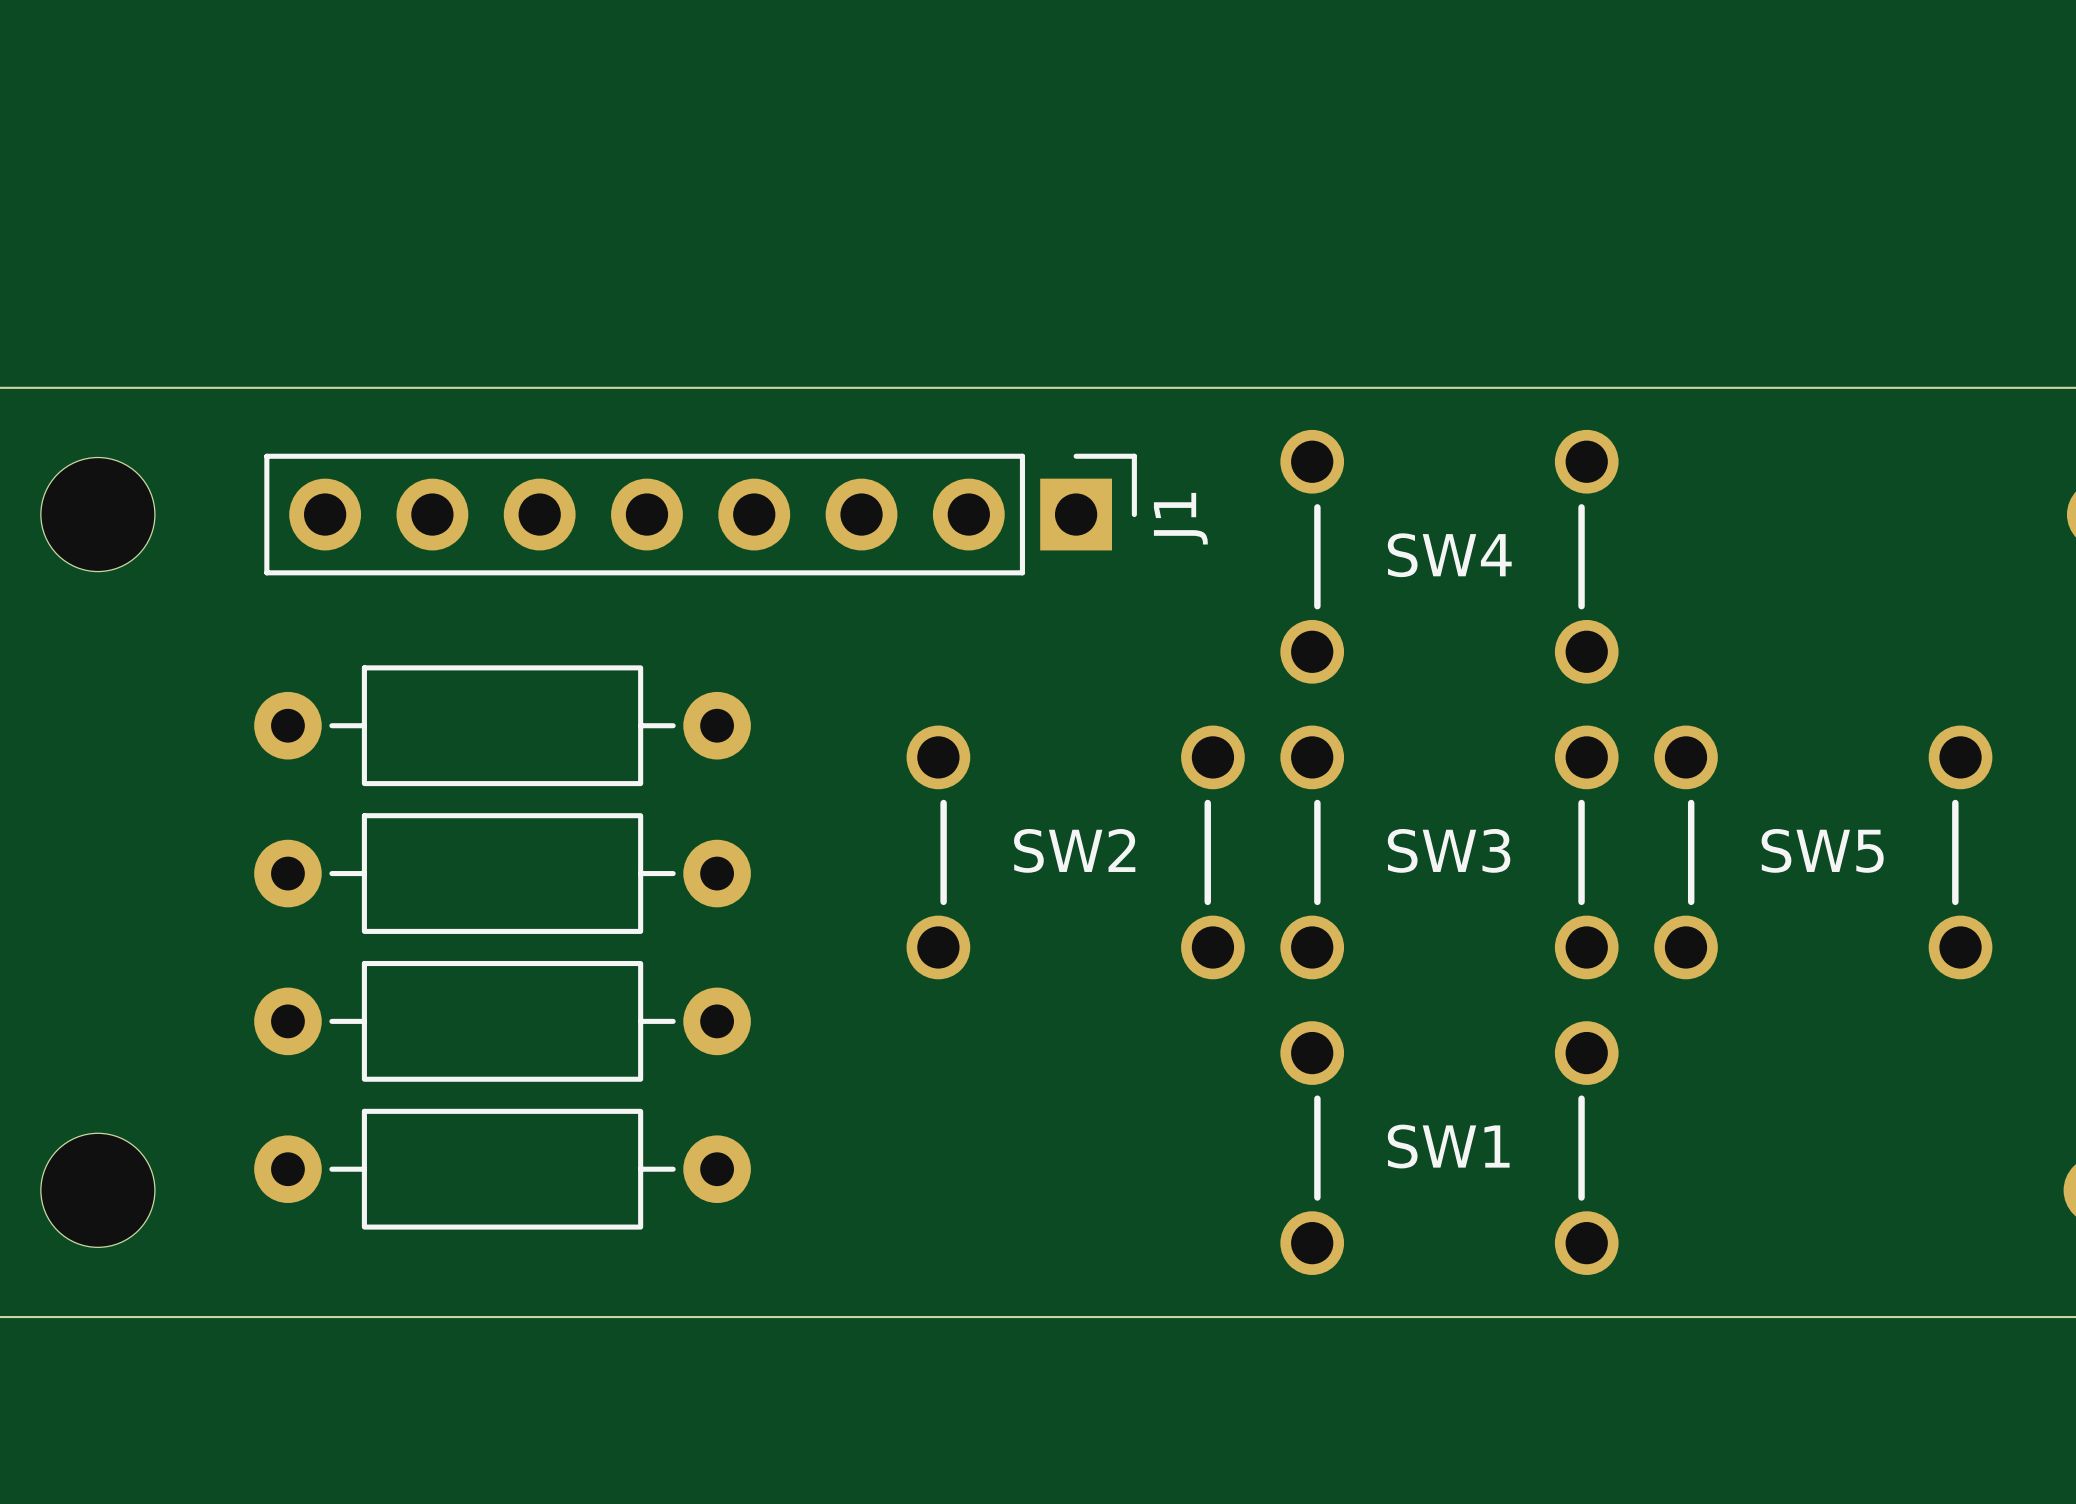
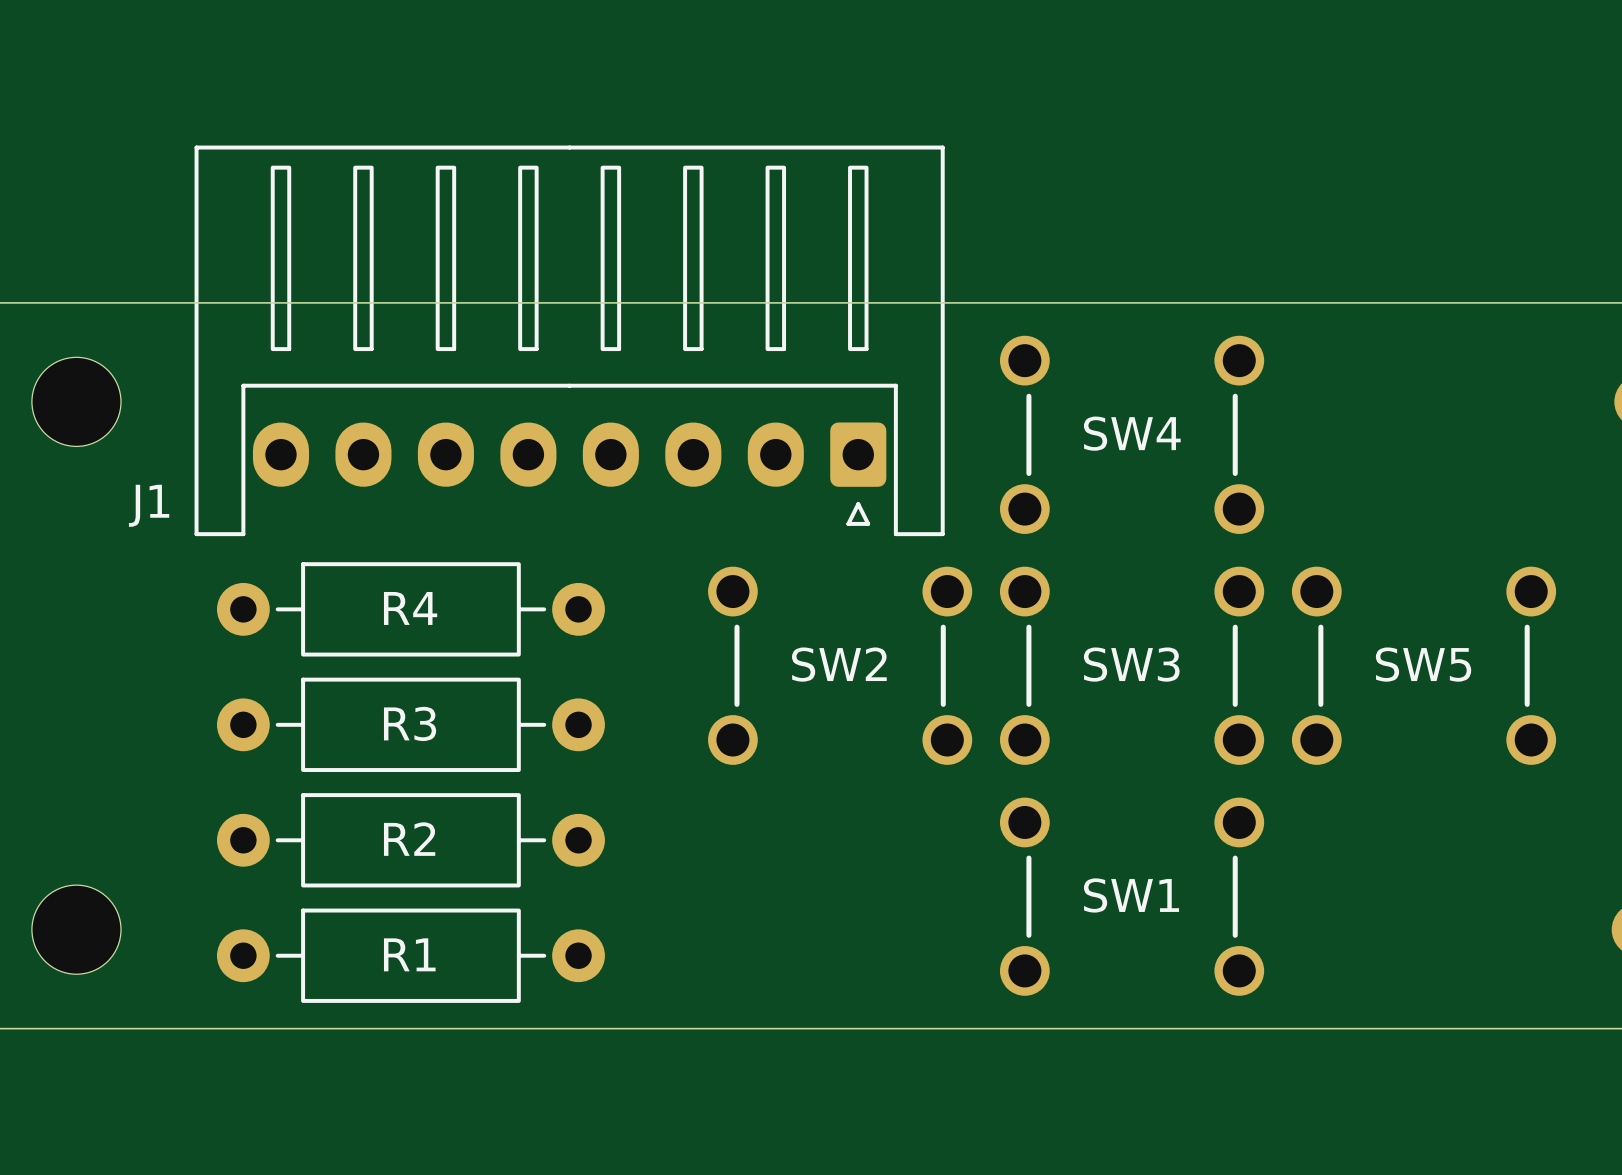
J1 footprint: [264, 453, 1137, 576] -> [194, 145, 945, 537]
J1 name position: J1 (1180, 518) -> J1 (149, 505)
part: (502, 725) -> none
R4: none -> (410, 609)
part: (502, 873) -> none
R3: none -> (410, 724)
part: (502, 1021) -> none
R2: none -> (410, 840)
part: (502, 1169) -> none
R1: none -> (410, 955)

